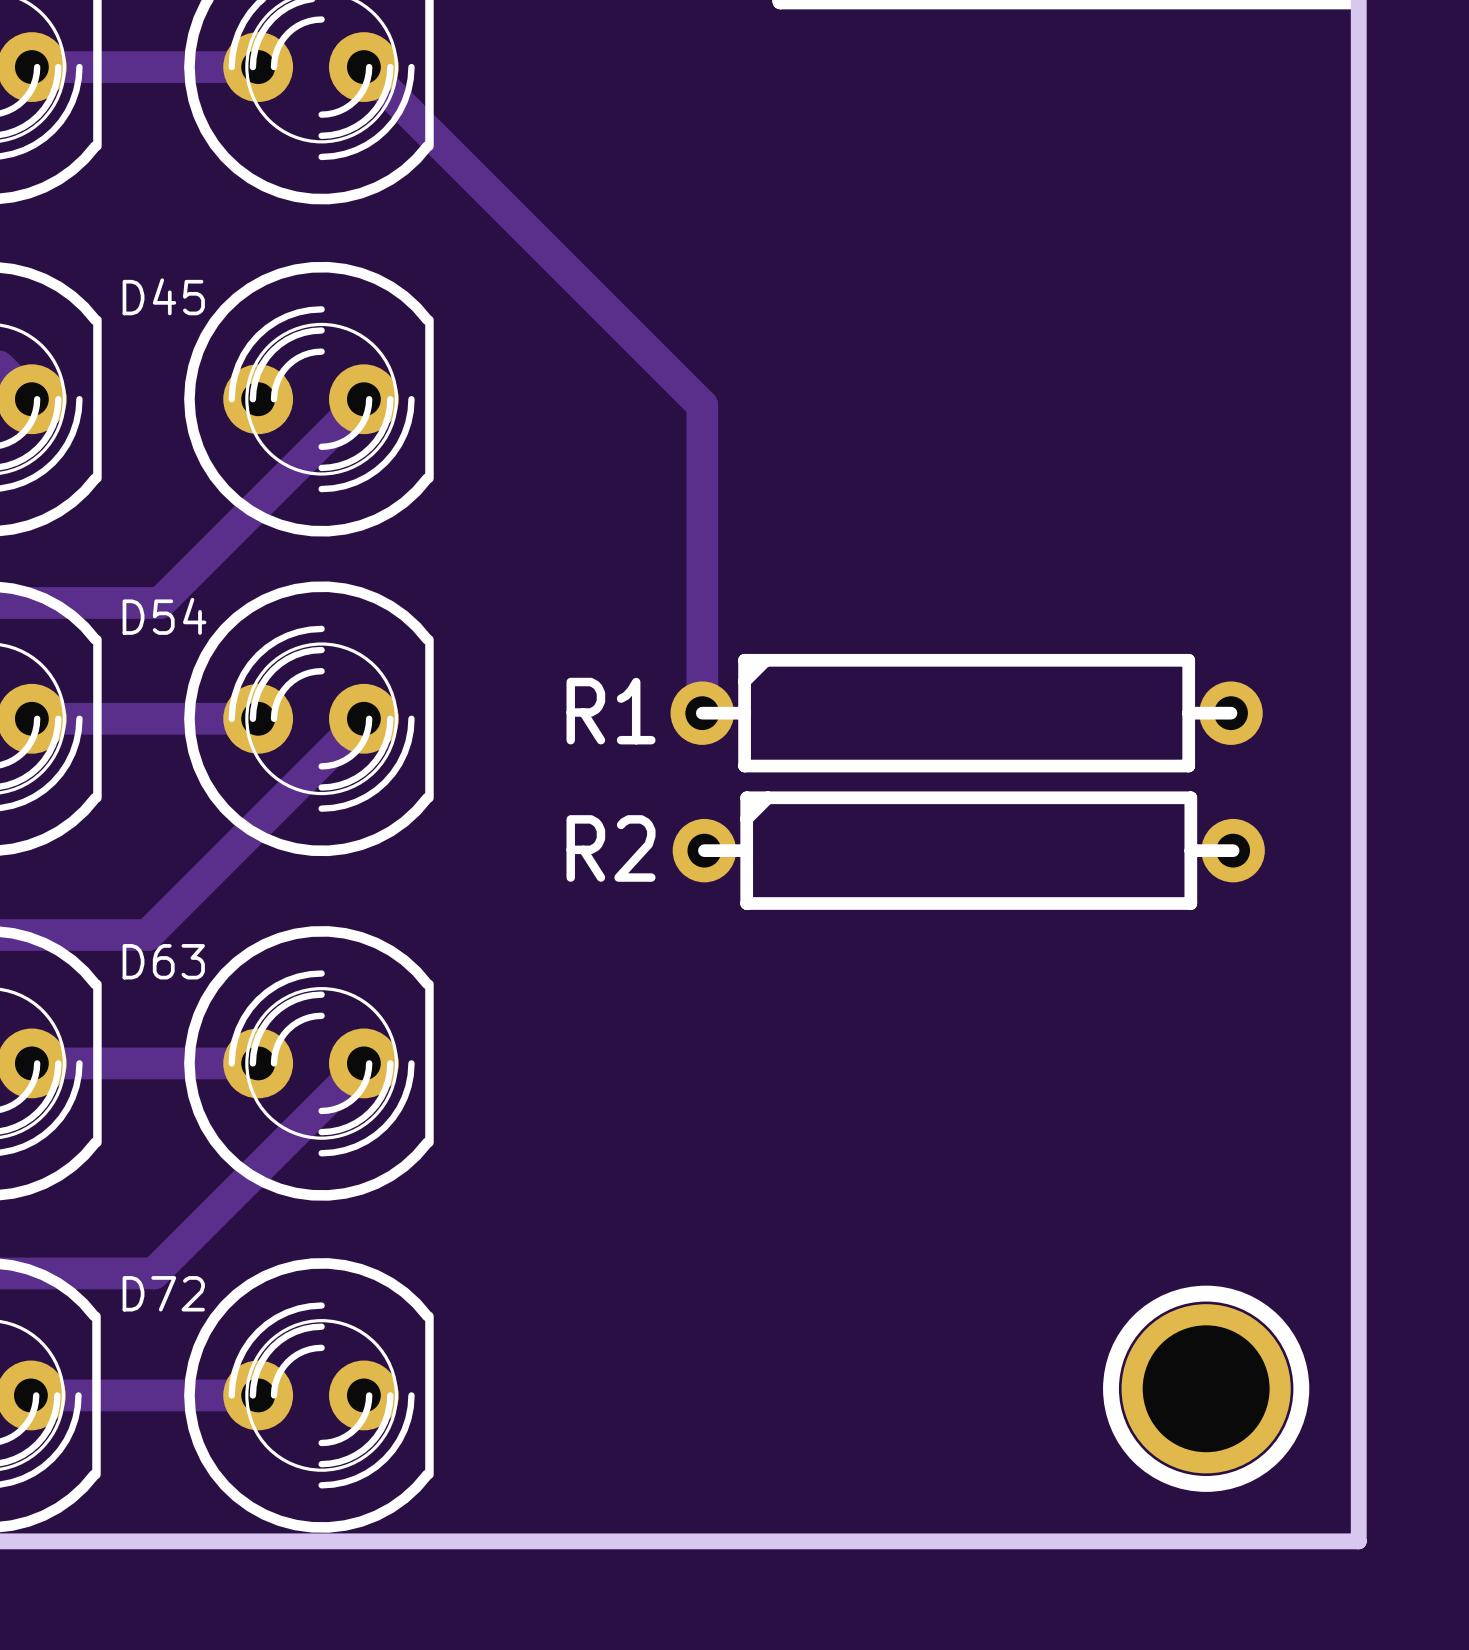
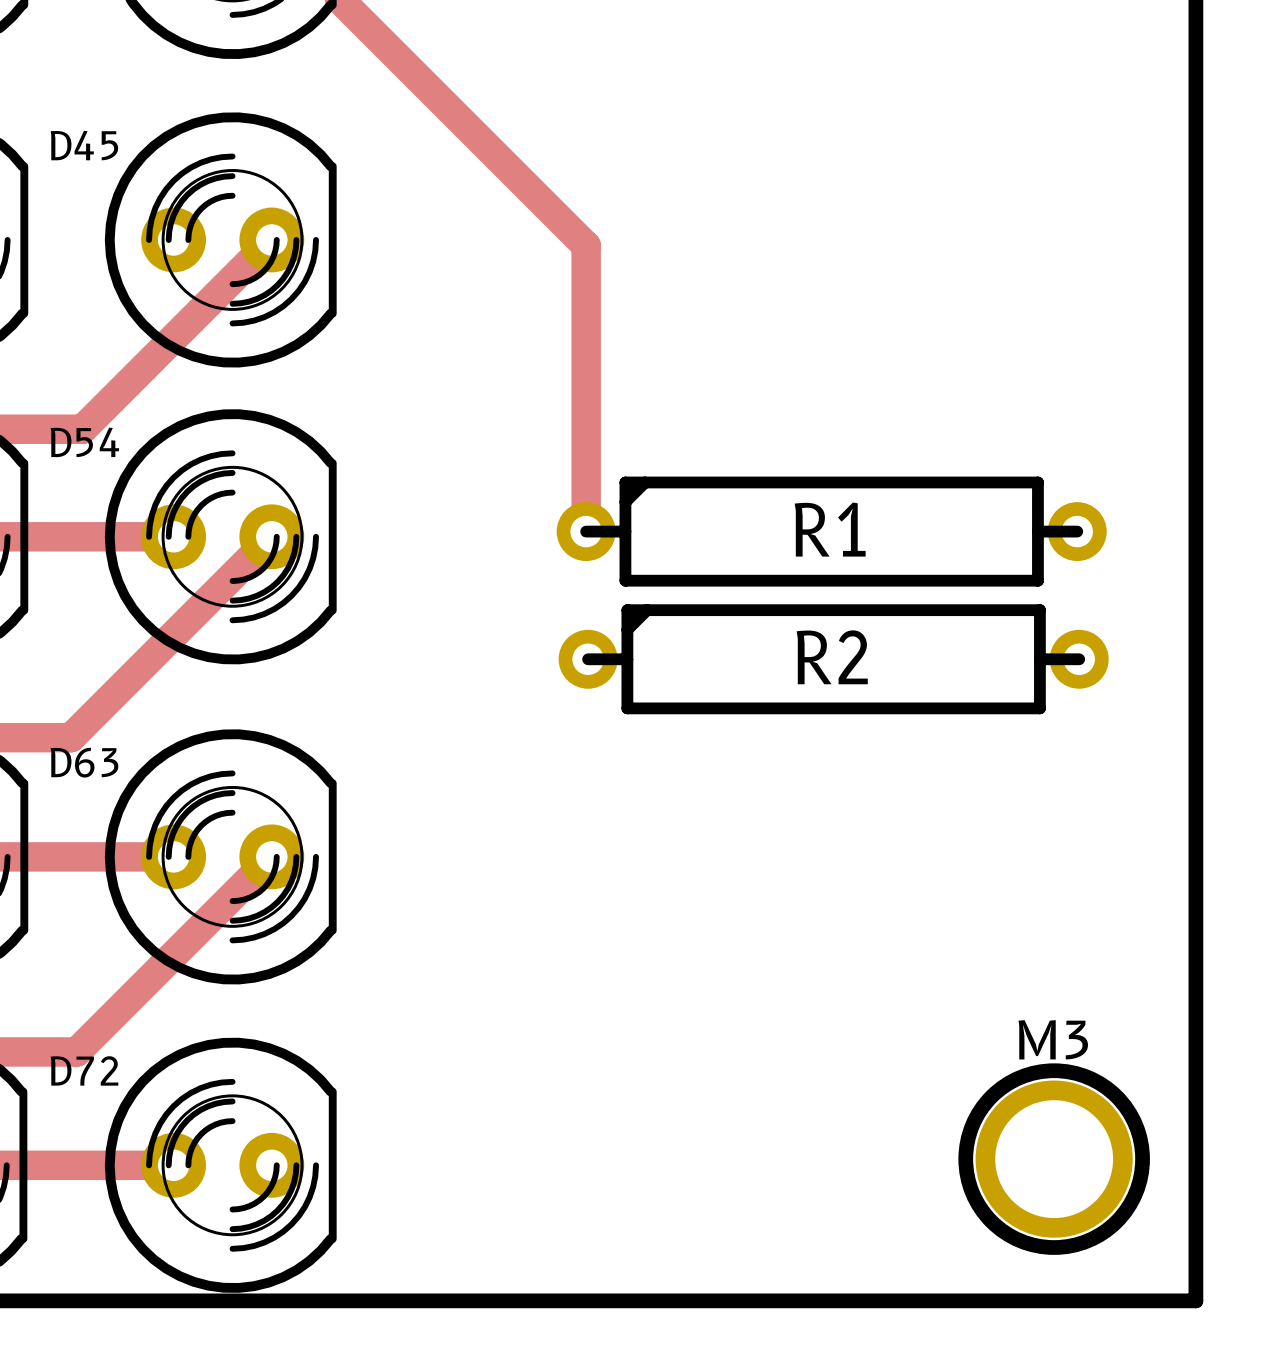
R1 name position: R1 (611, 711) -> R1 (830, 529)
R2 name position: R2 (611, 848) -> R2 (832, 657)
M3 name: none -> M3 (1053, 1039)

